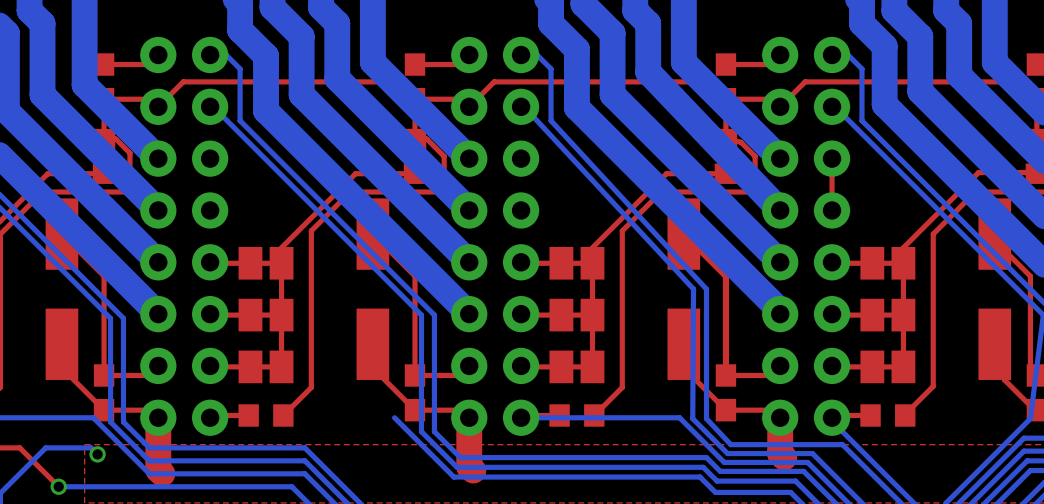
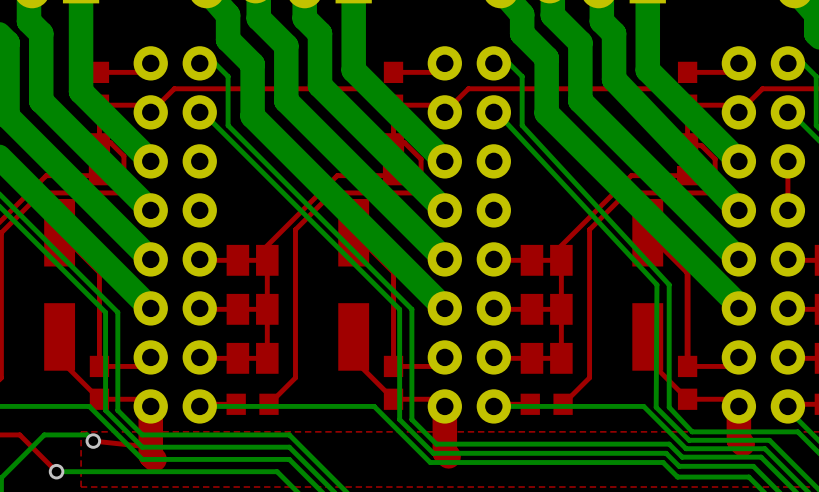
bottom track: none -> (374, 406) (199, 406)
top track: none -> (93, 441) (150, 447)

